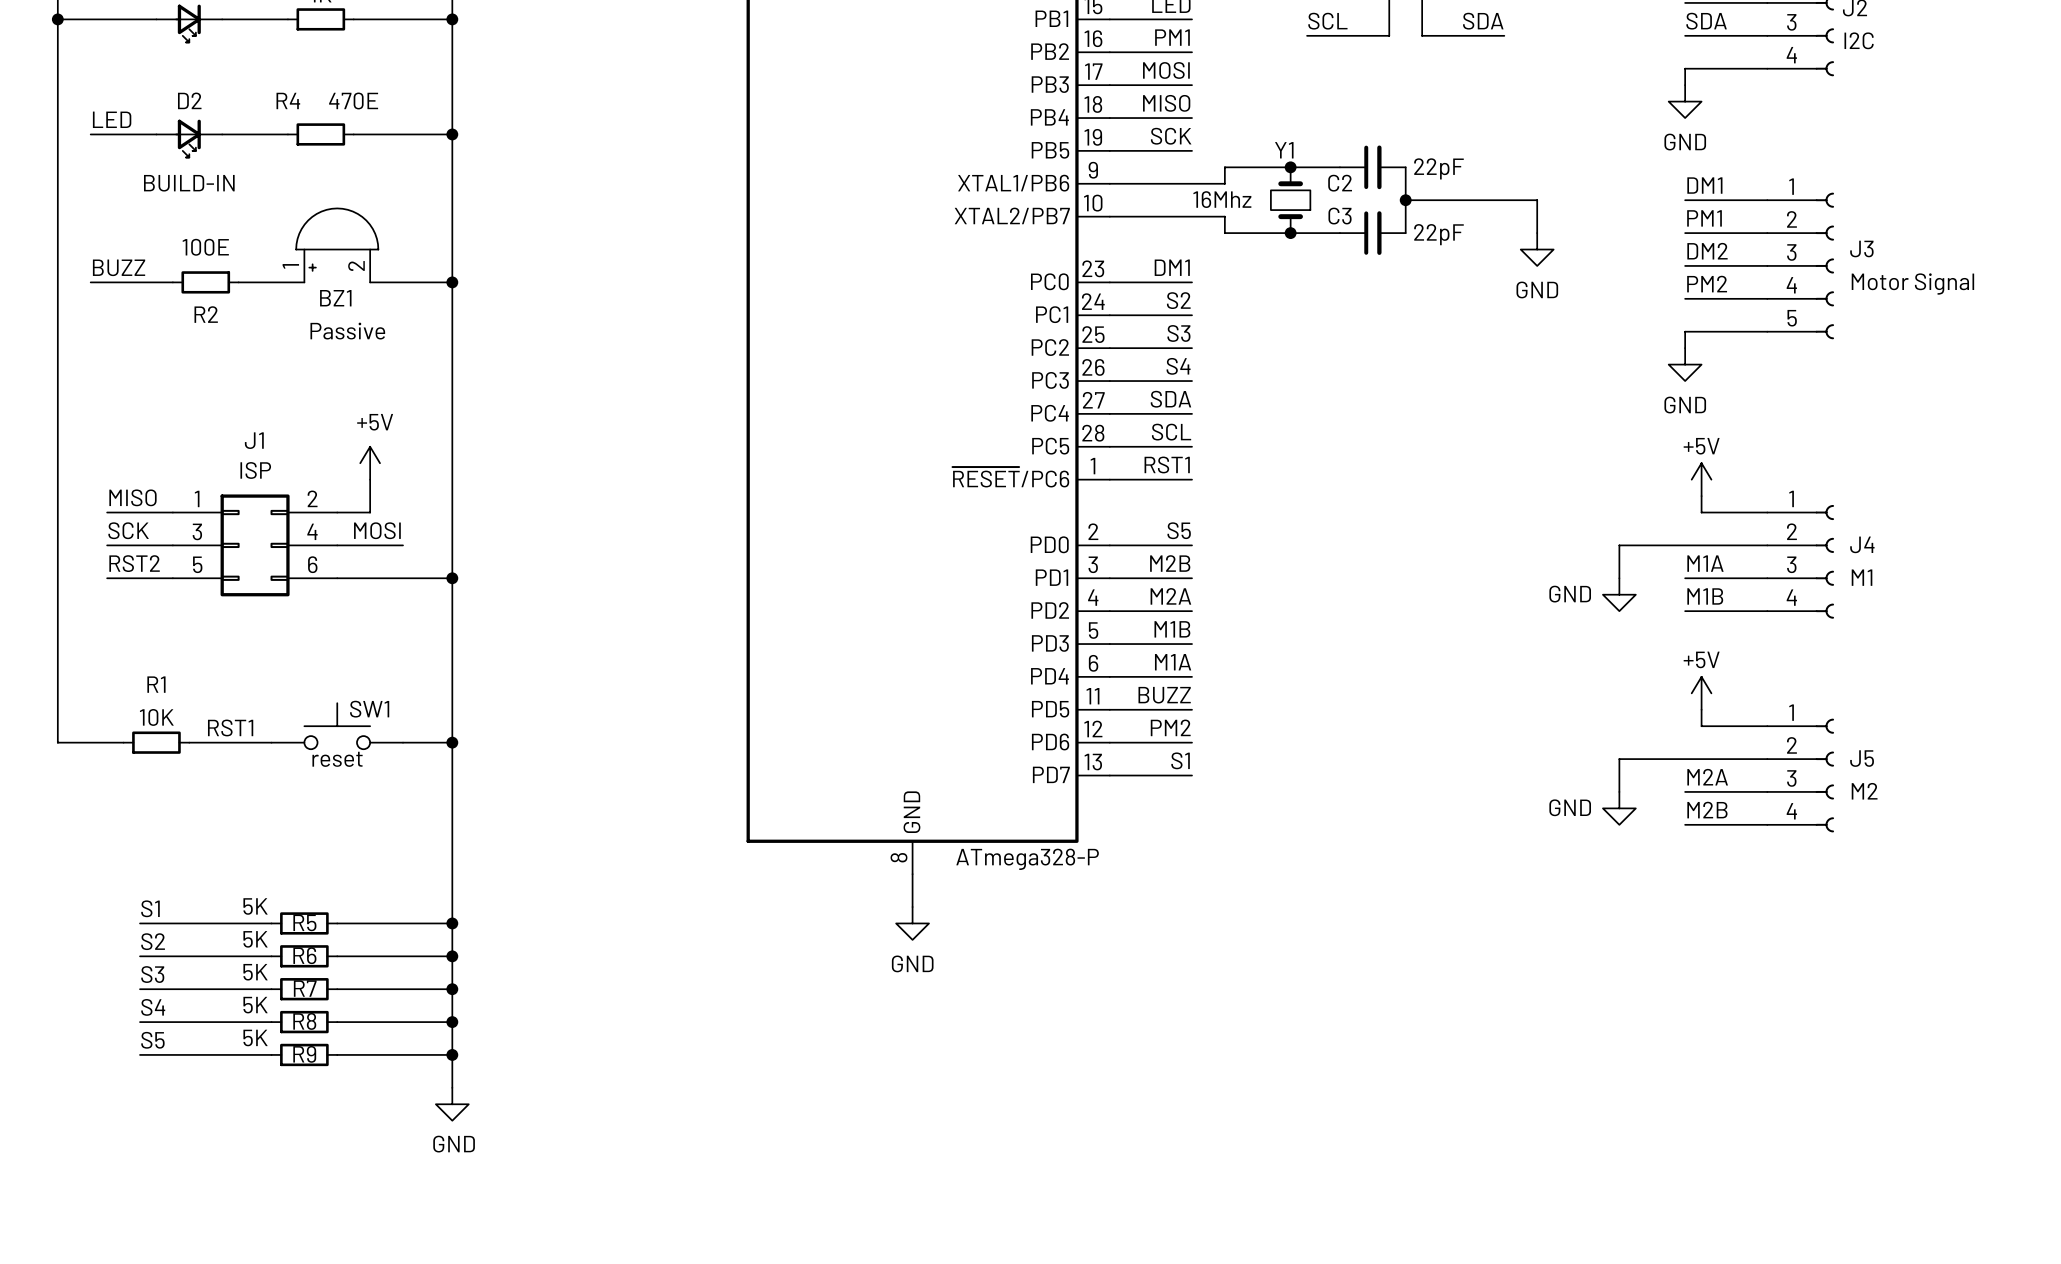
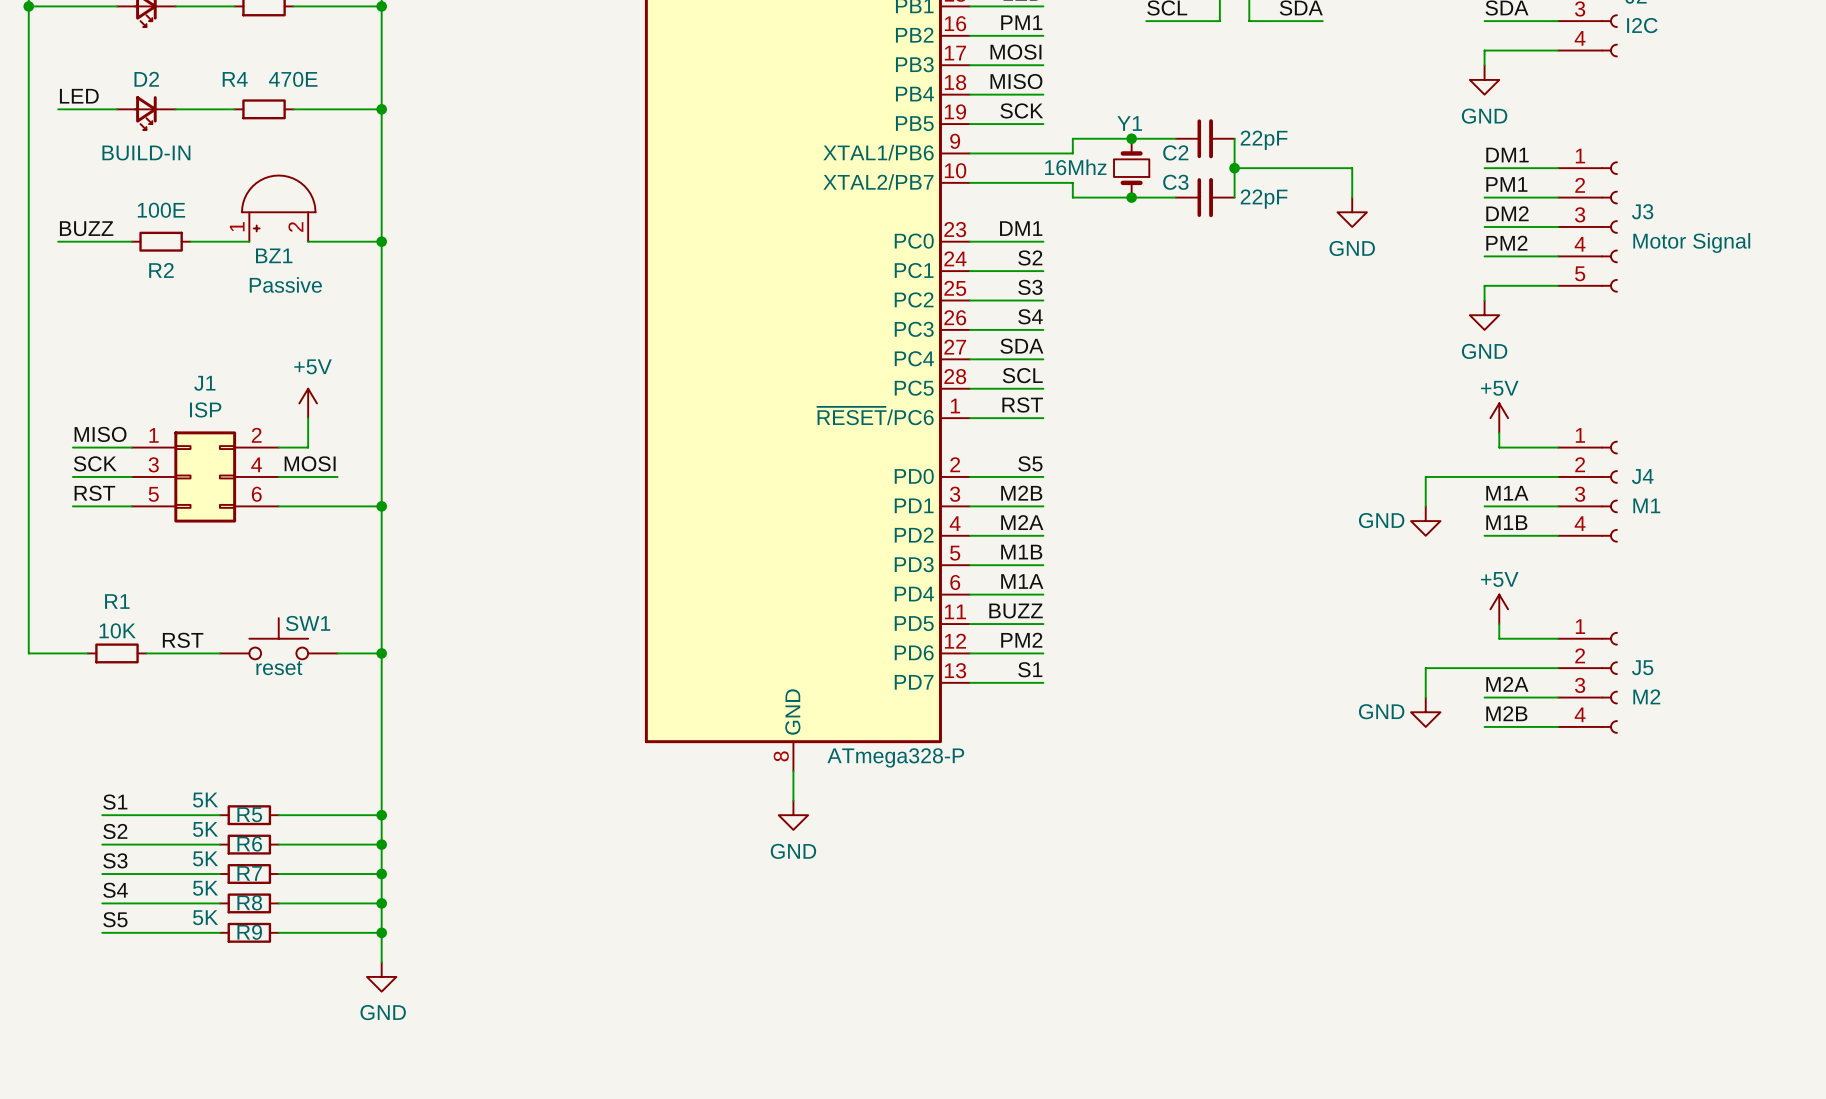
label: RST1 (1167, 464) -> RST (1022, 405)
label: RST2 (134, 563) -> RST (94, 493)
label: RST1 (230, 727) -> RST (183, 640)

